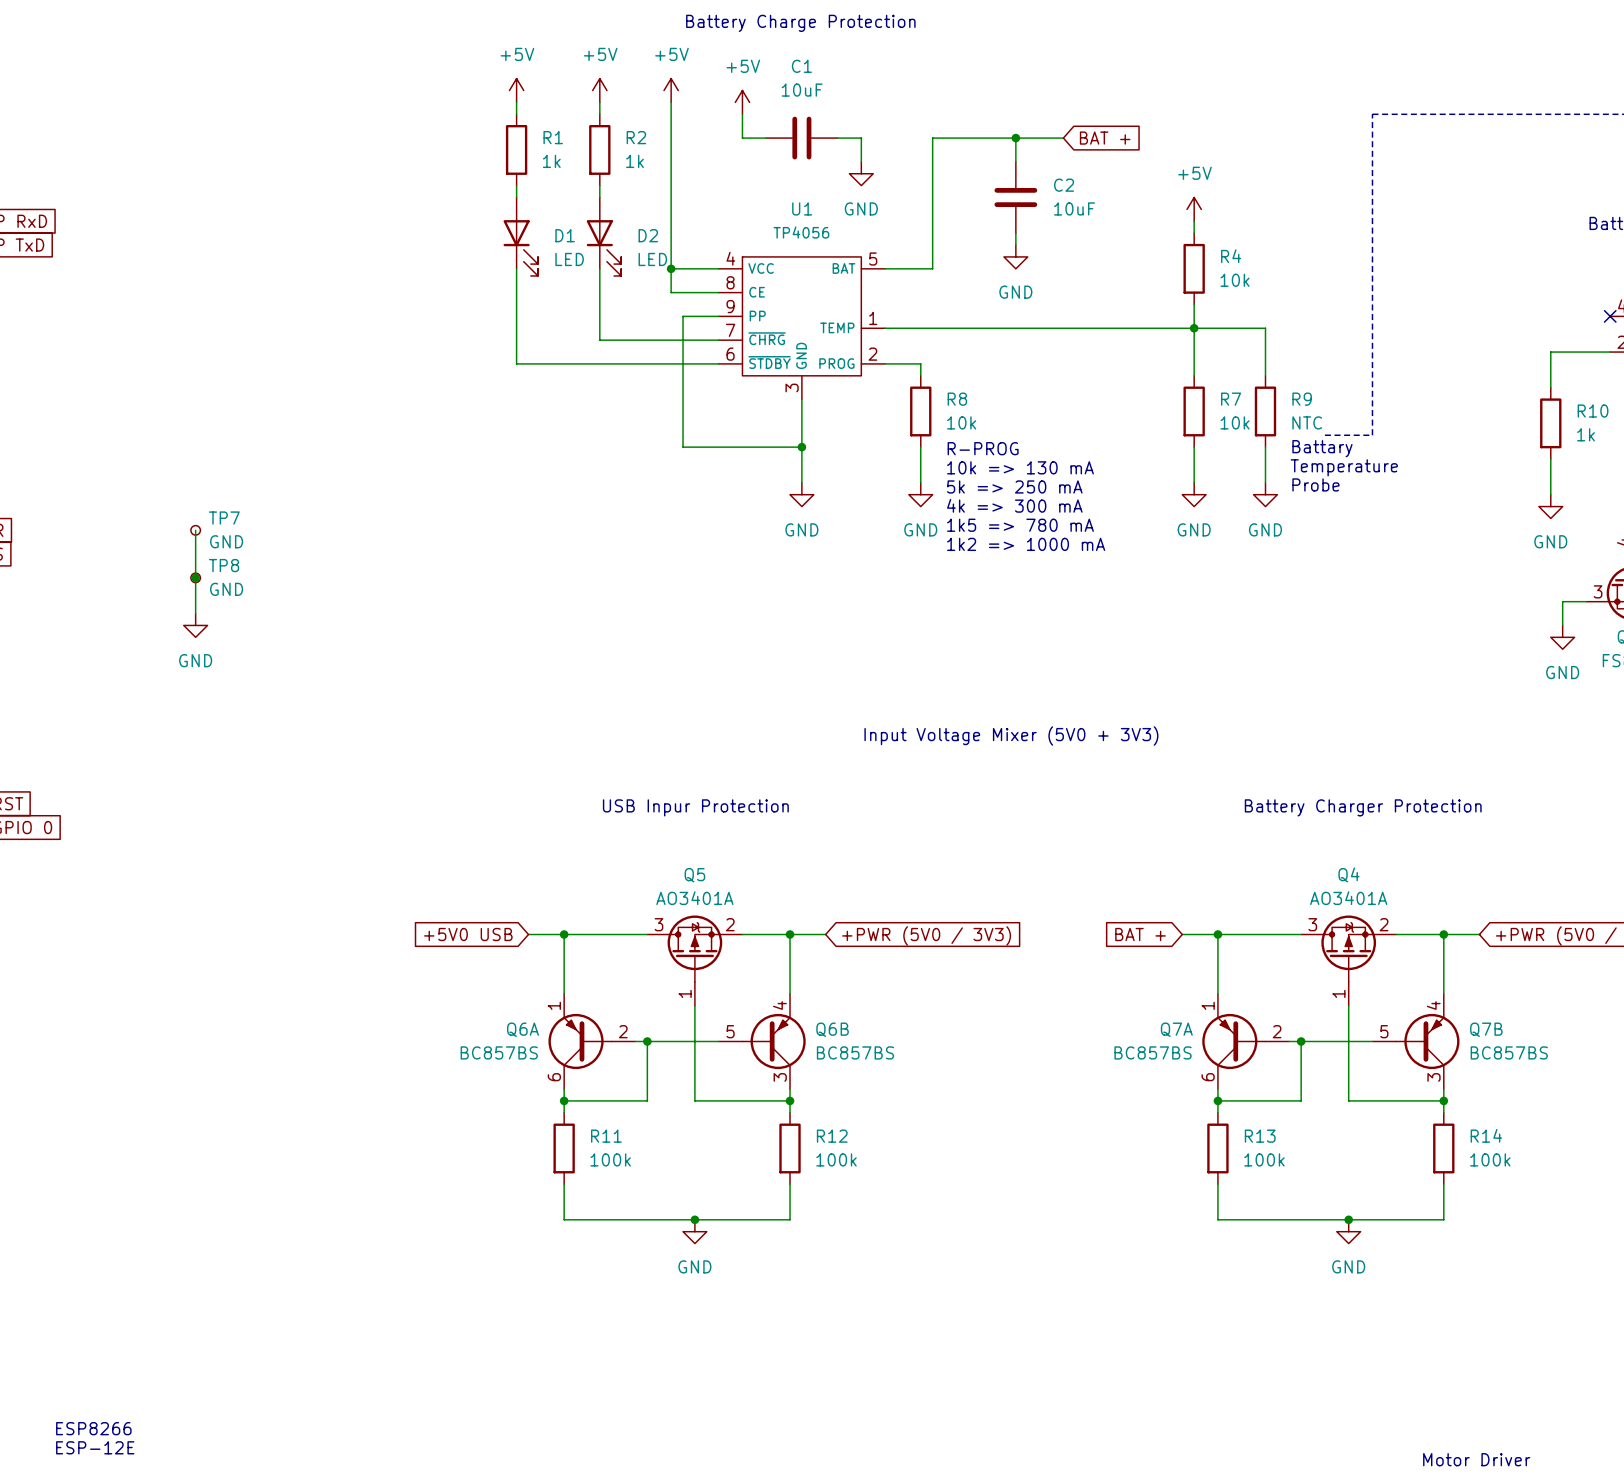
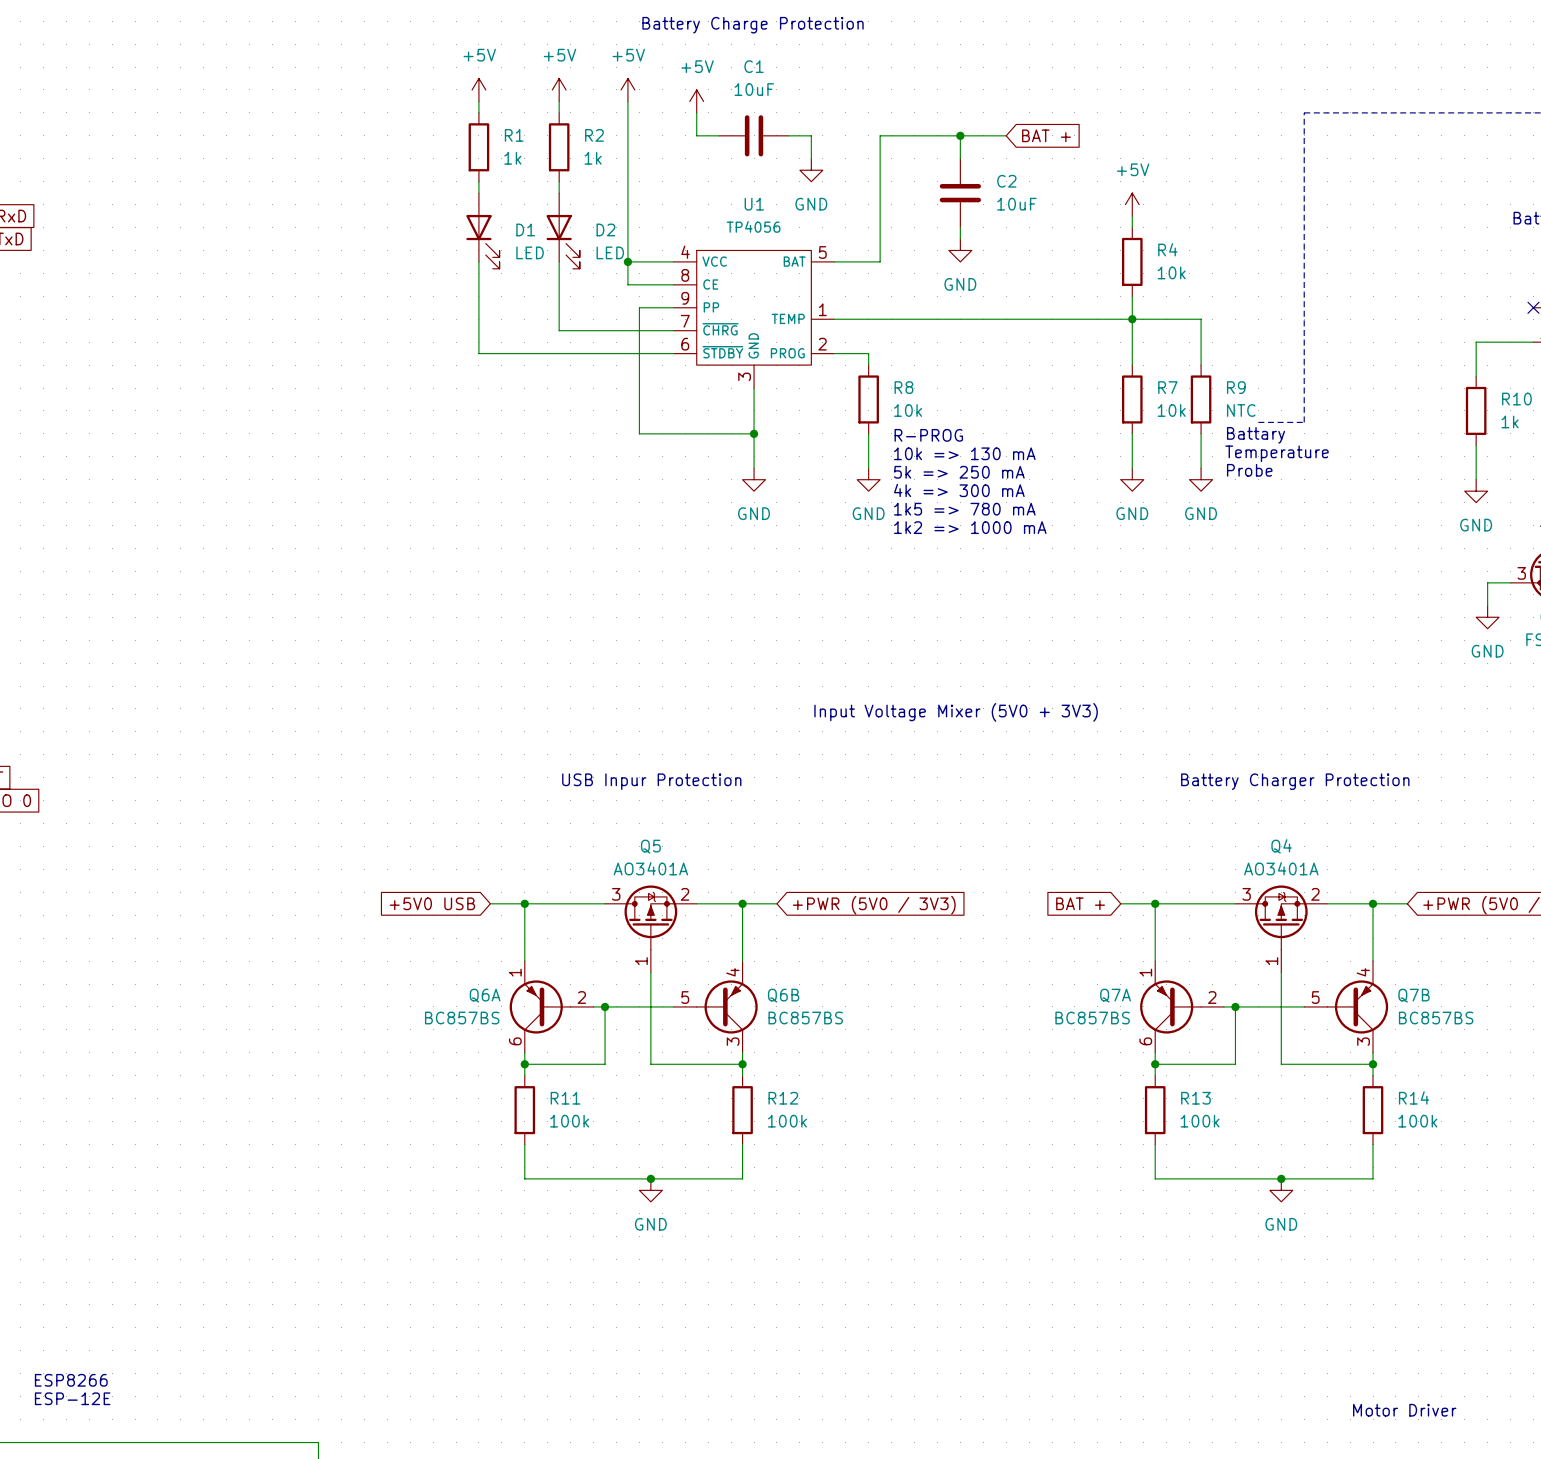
wire: (195, 530) (195, 613) -> none
TP7: GND (195, 530) -> none
junction: (195, 577) -> none
TP8: GND (195, 577) -> none
power symbol: GND (195, 625) -> none

